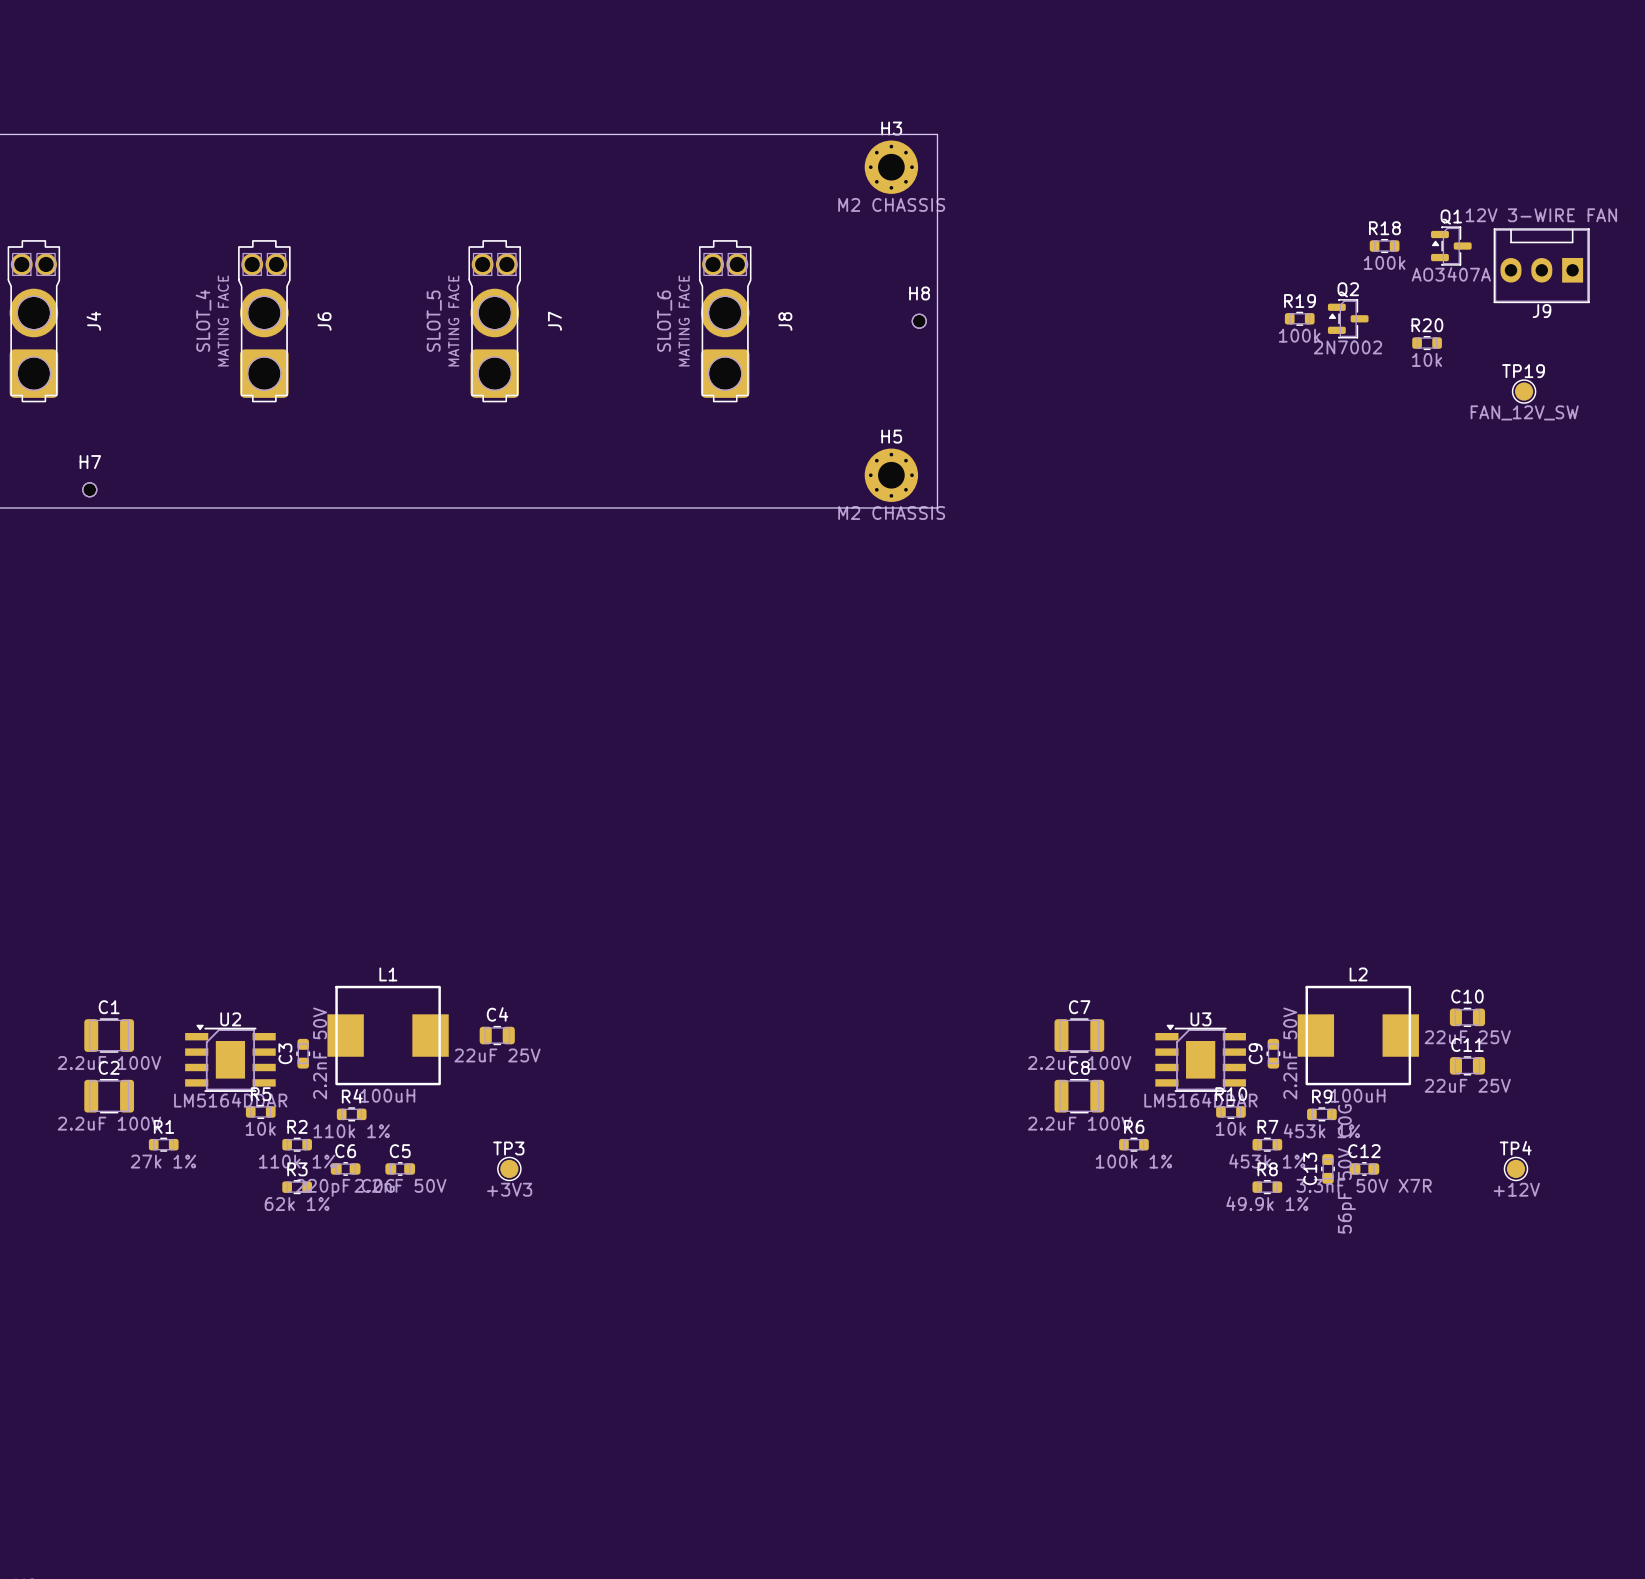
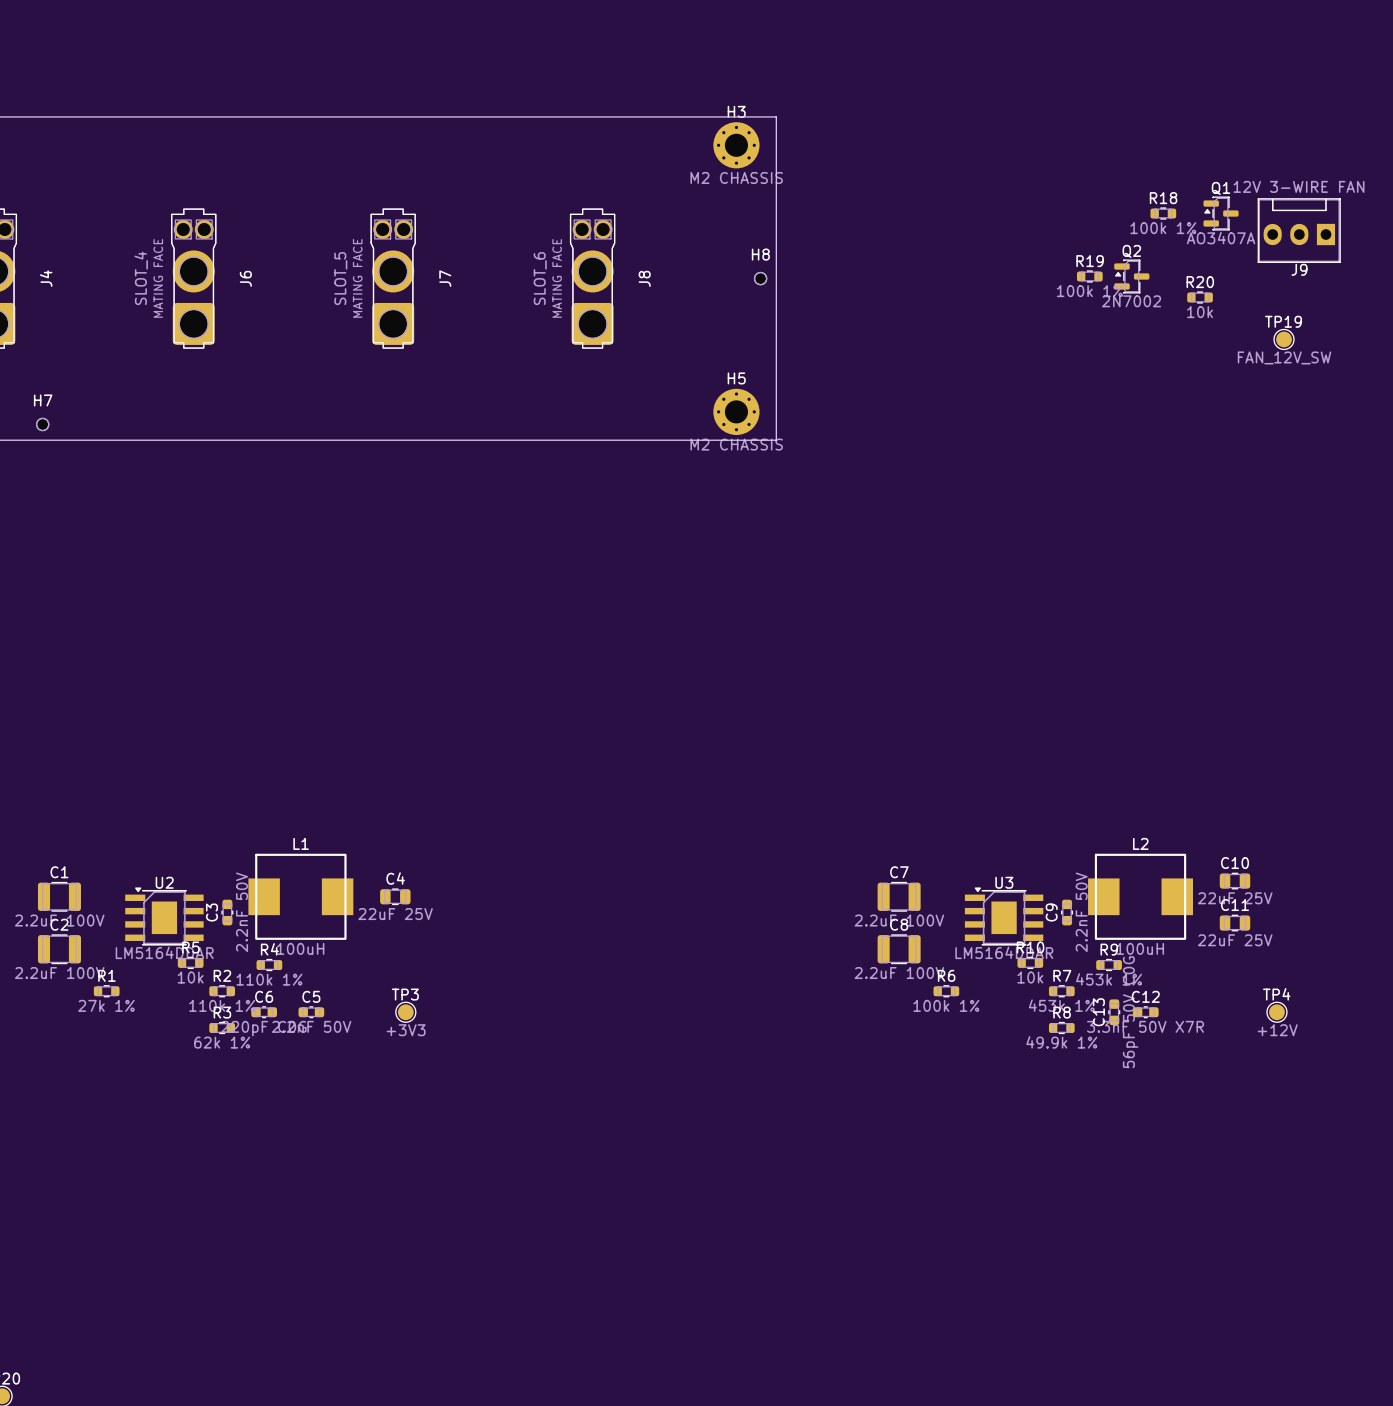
R18 value: 100k (1384, 262) -> 100k 1% (1163, 228)
R19 value: 100k (1299, 335) -> 100k 1% (1089, 291)

